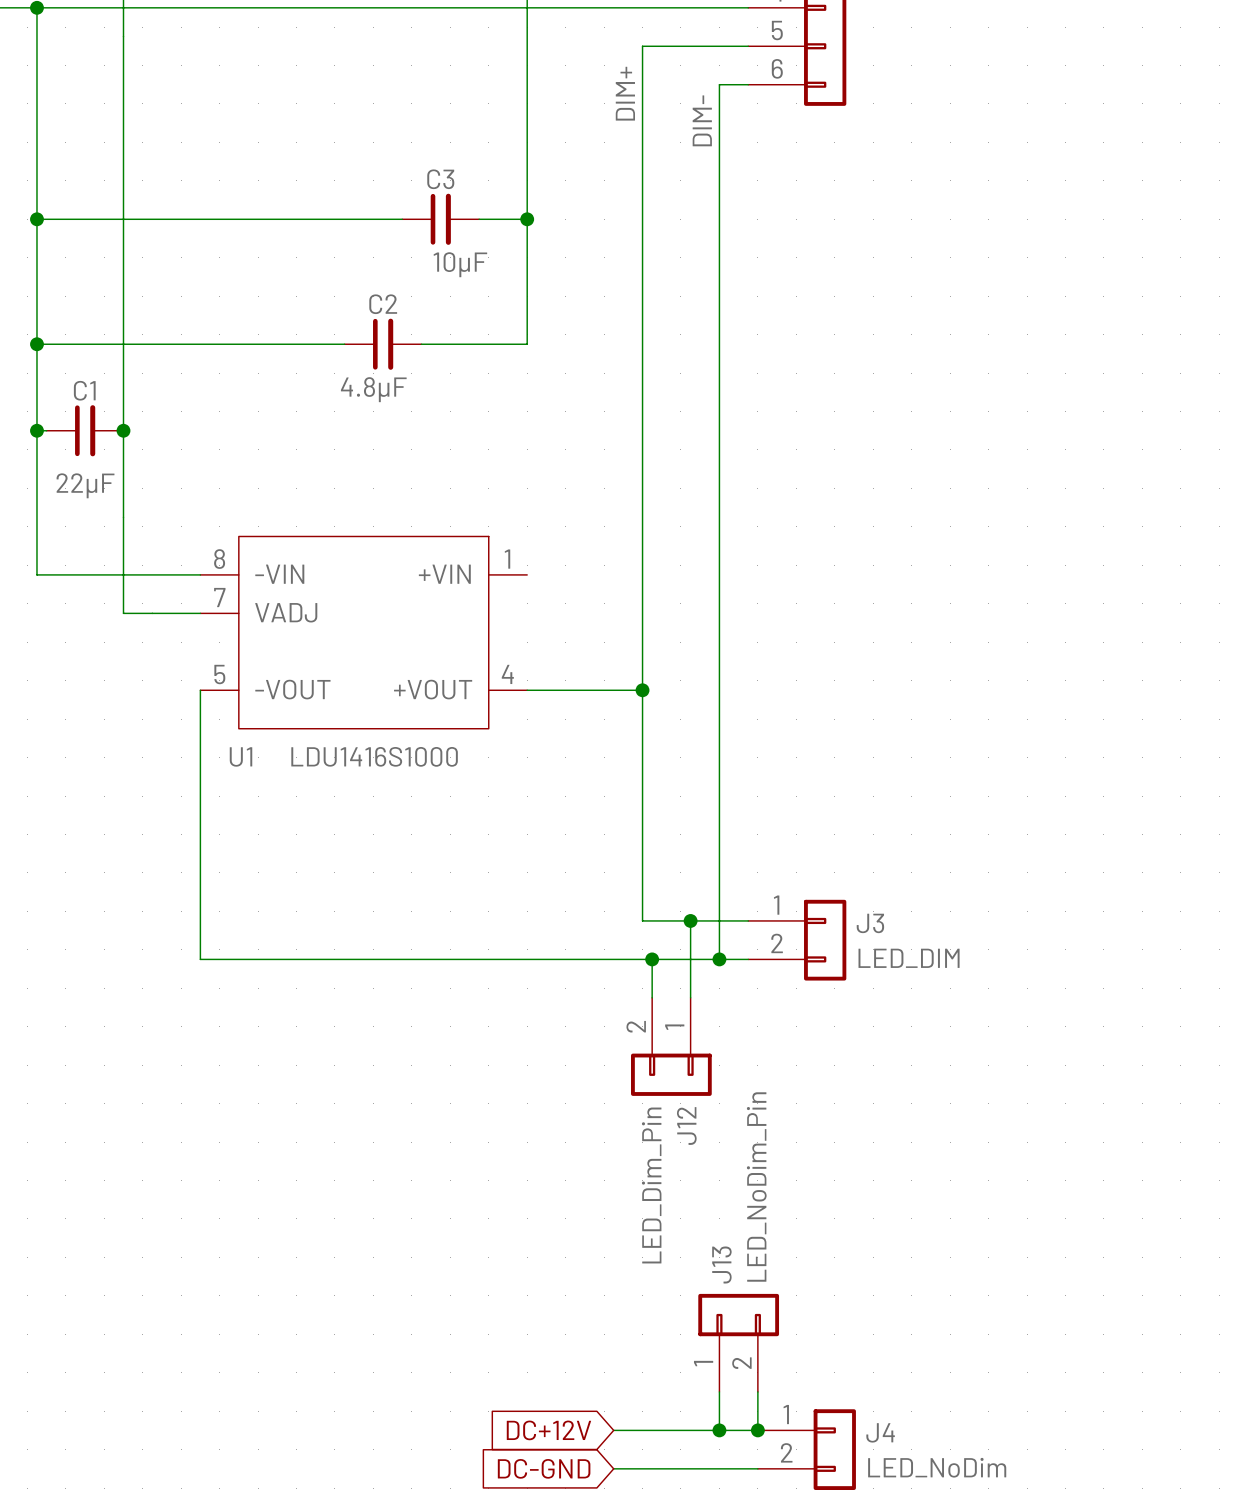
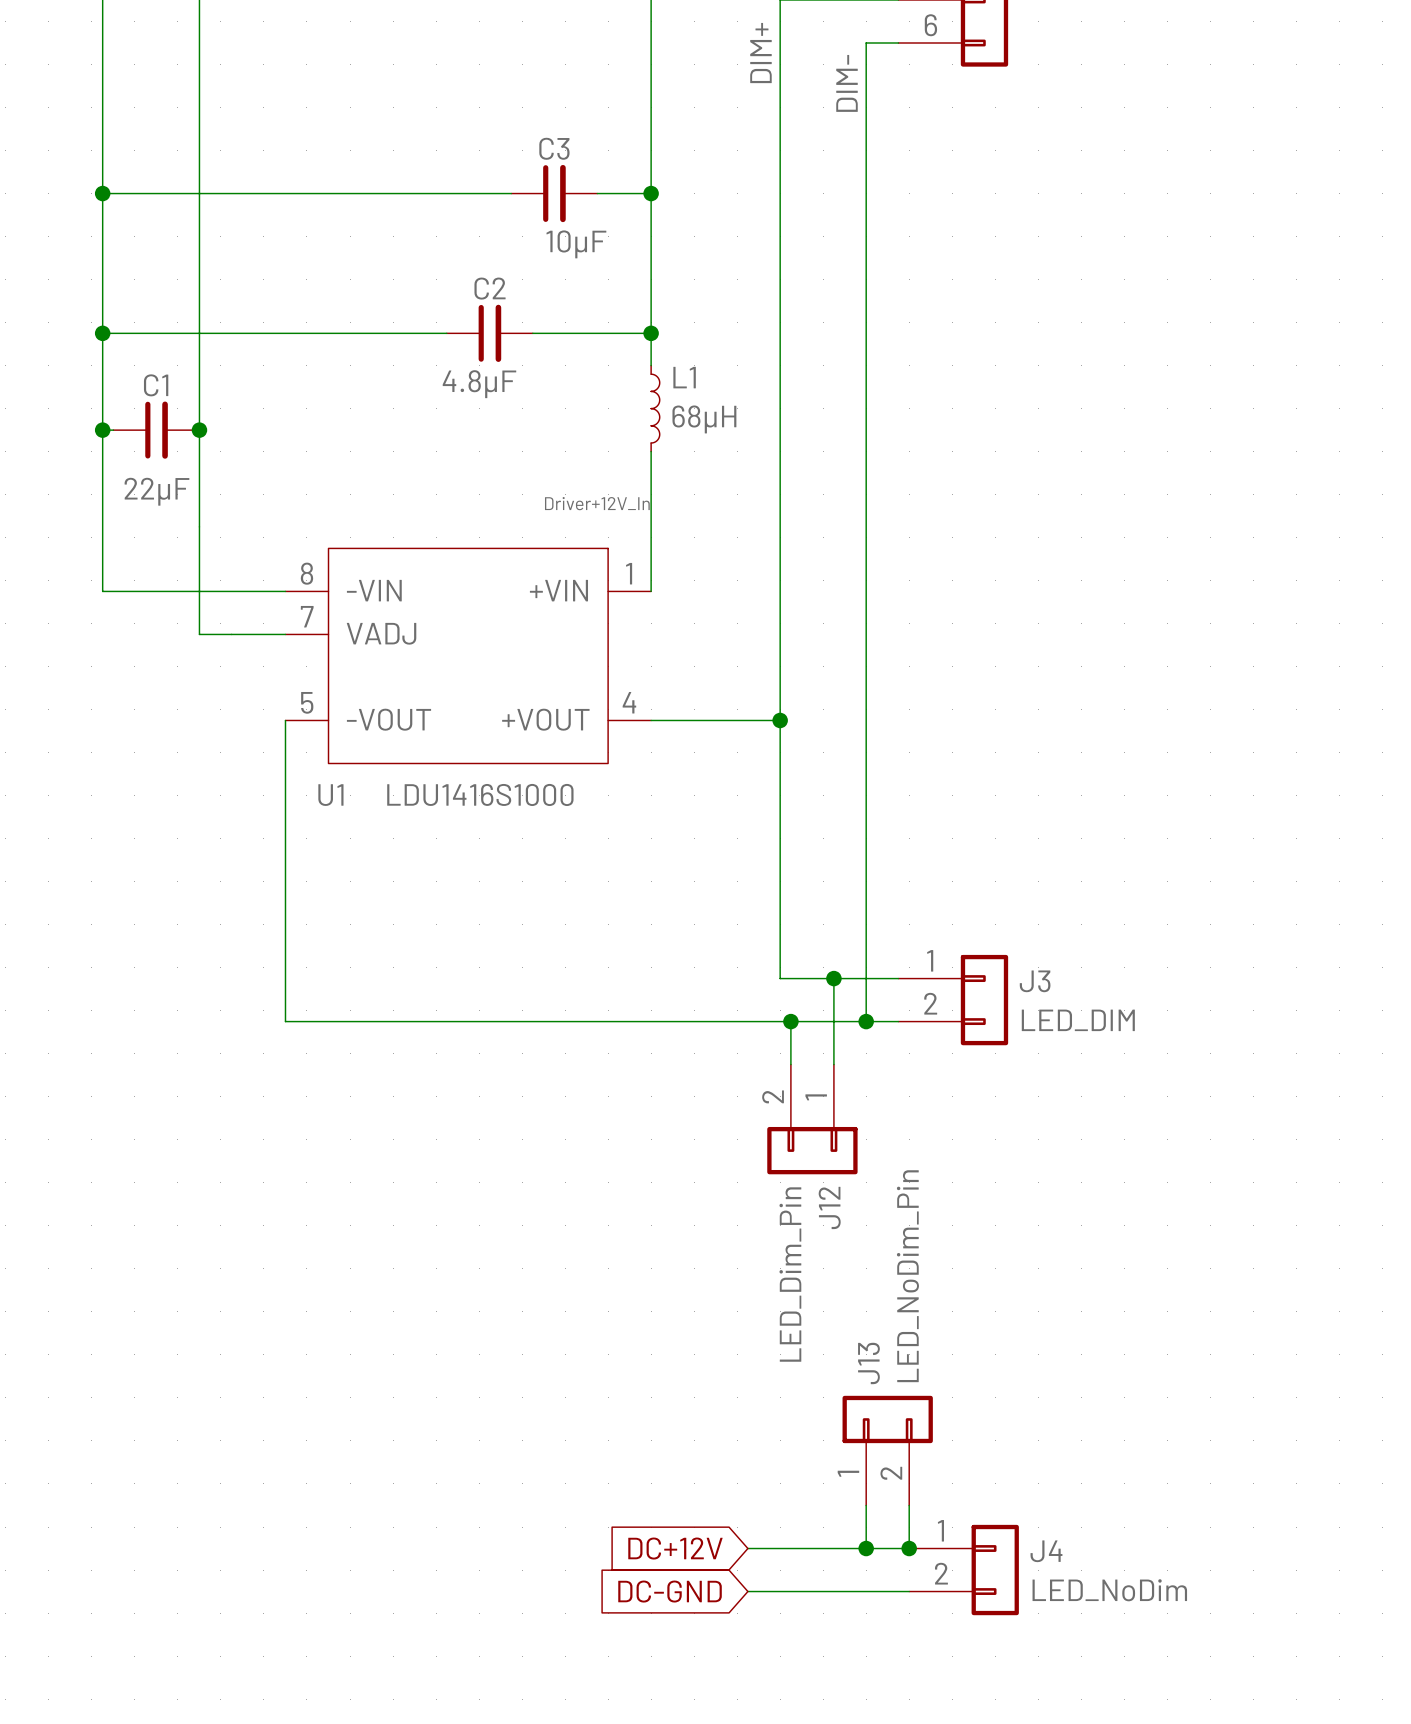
wire: none -> (651, 333) (651, 365)
junction: none -> (651, 333)
L1: none -> 68µH (655, 408)
wire: none -> (651, 451) (651, 591)
label: none -> Driver+12V_In (597, 503)

